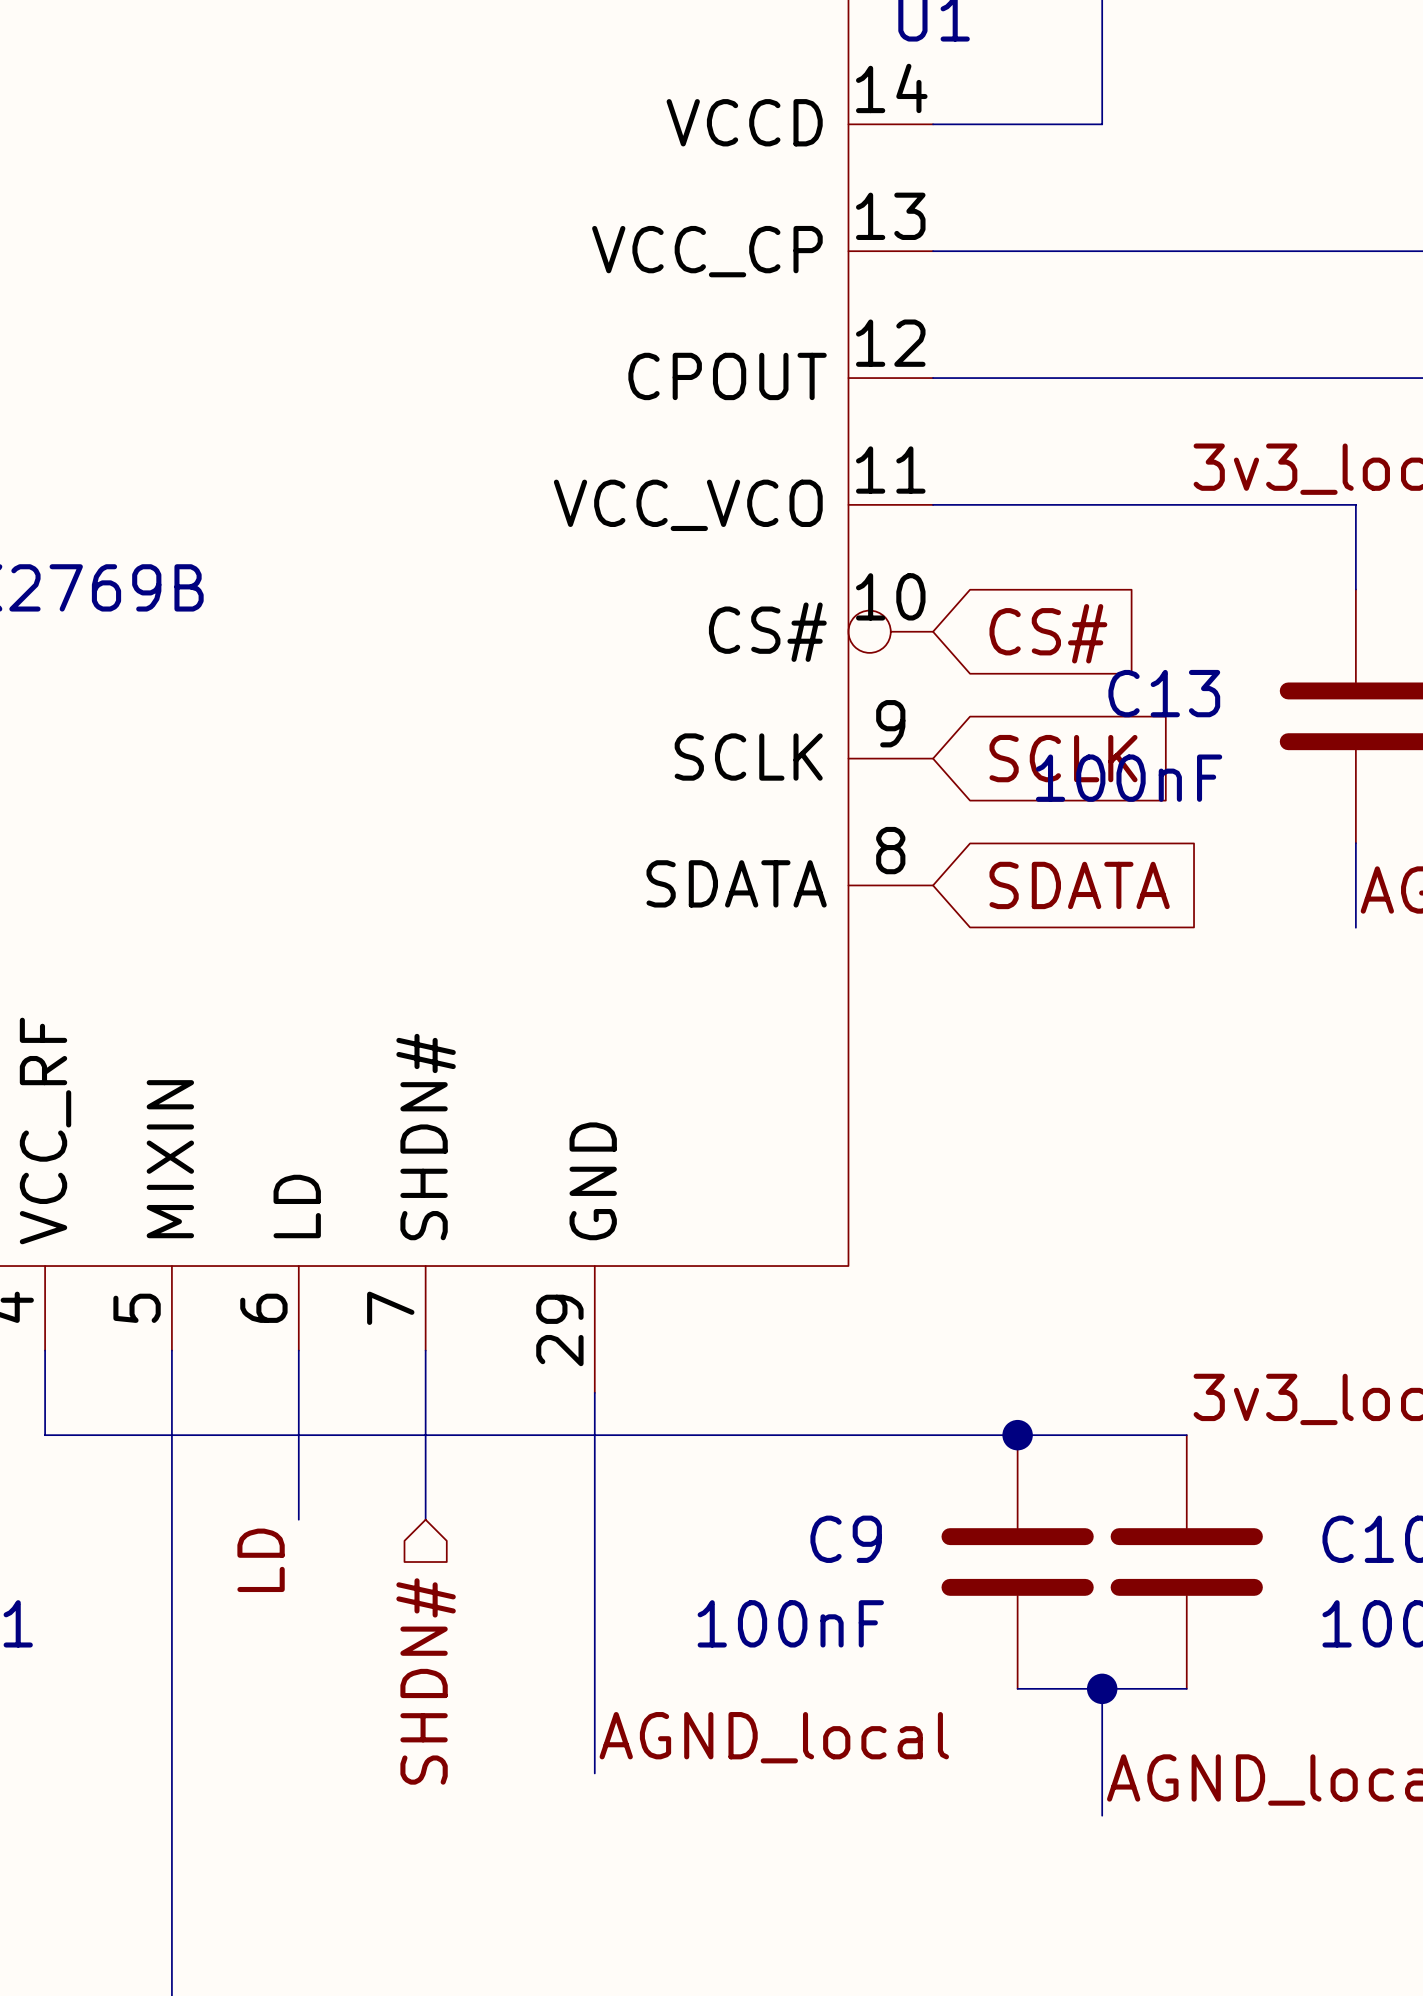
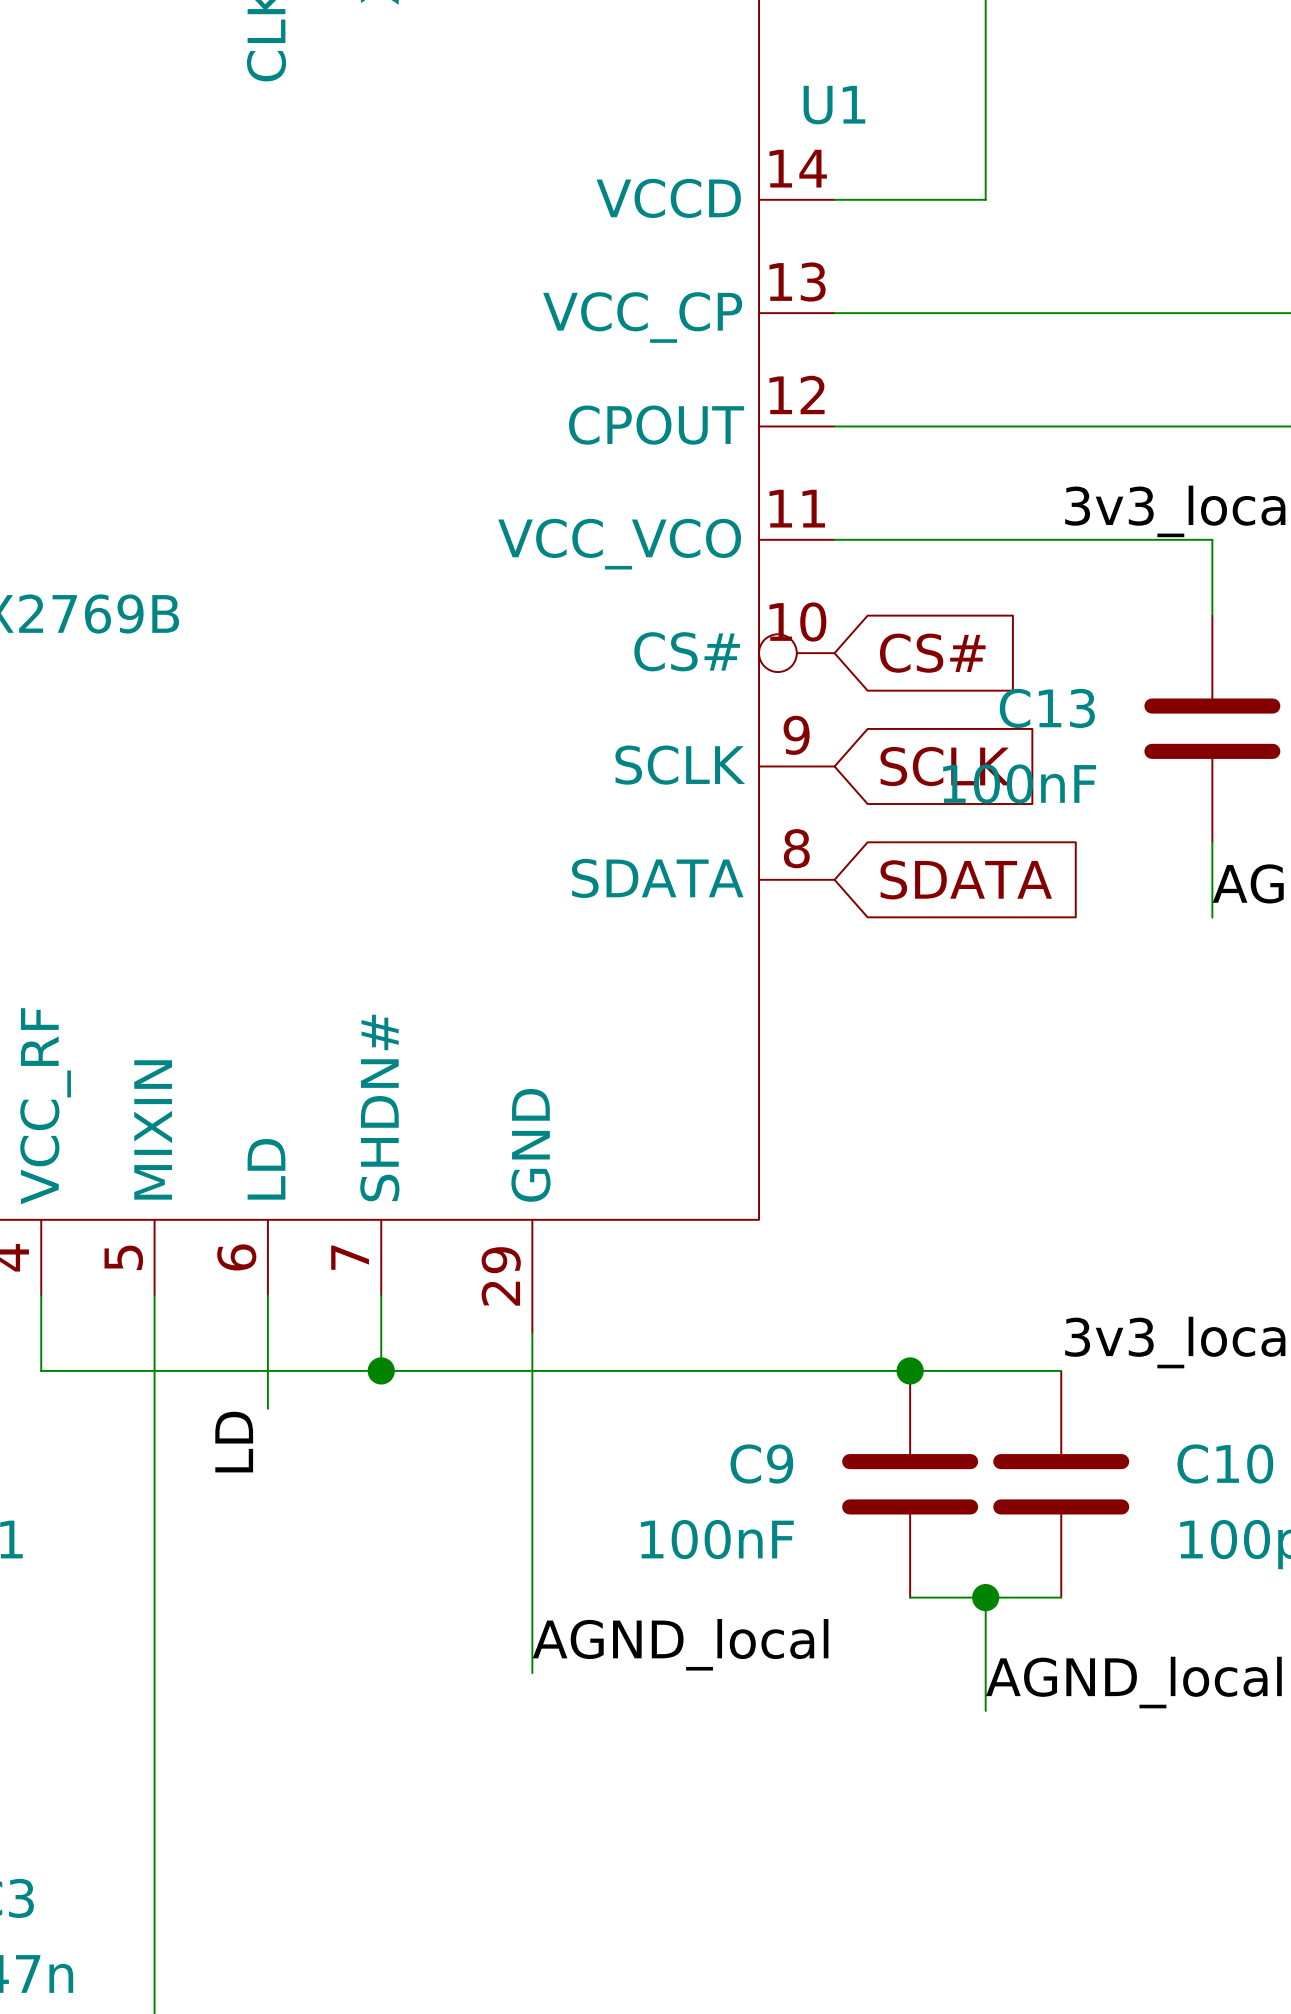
wire: (425, 1435) (425, 1519) -> none
junction: none -> (381, 1370)
wire: (298, 1477) (298, 1519) -> none
label position: LD (261, 1560) -> LD (234, 1442)
hierarchical label: SHDN# (426, 1681) -> none

